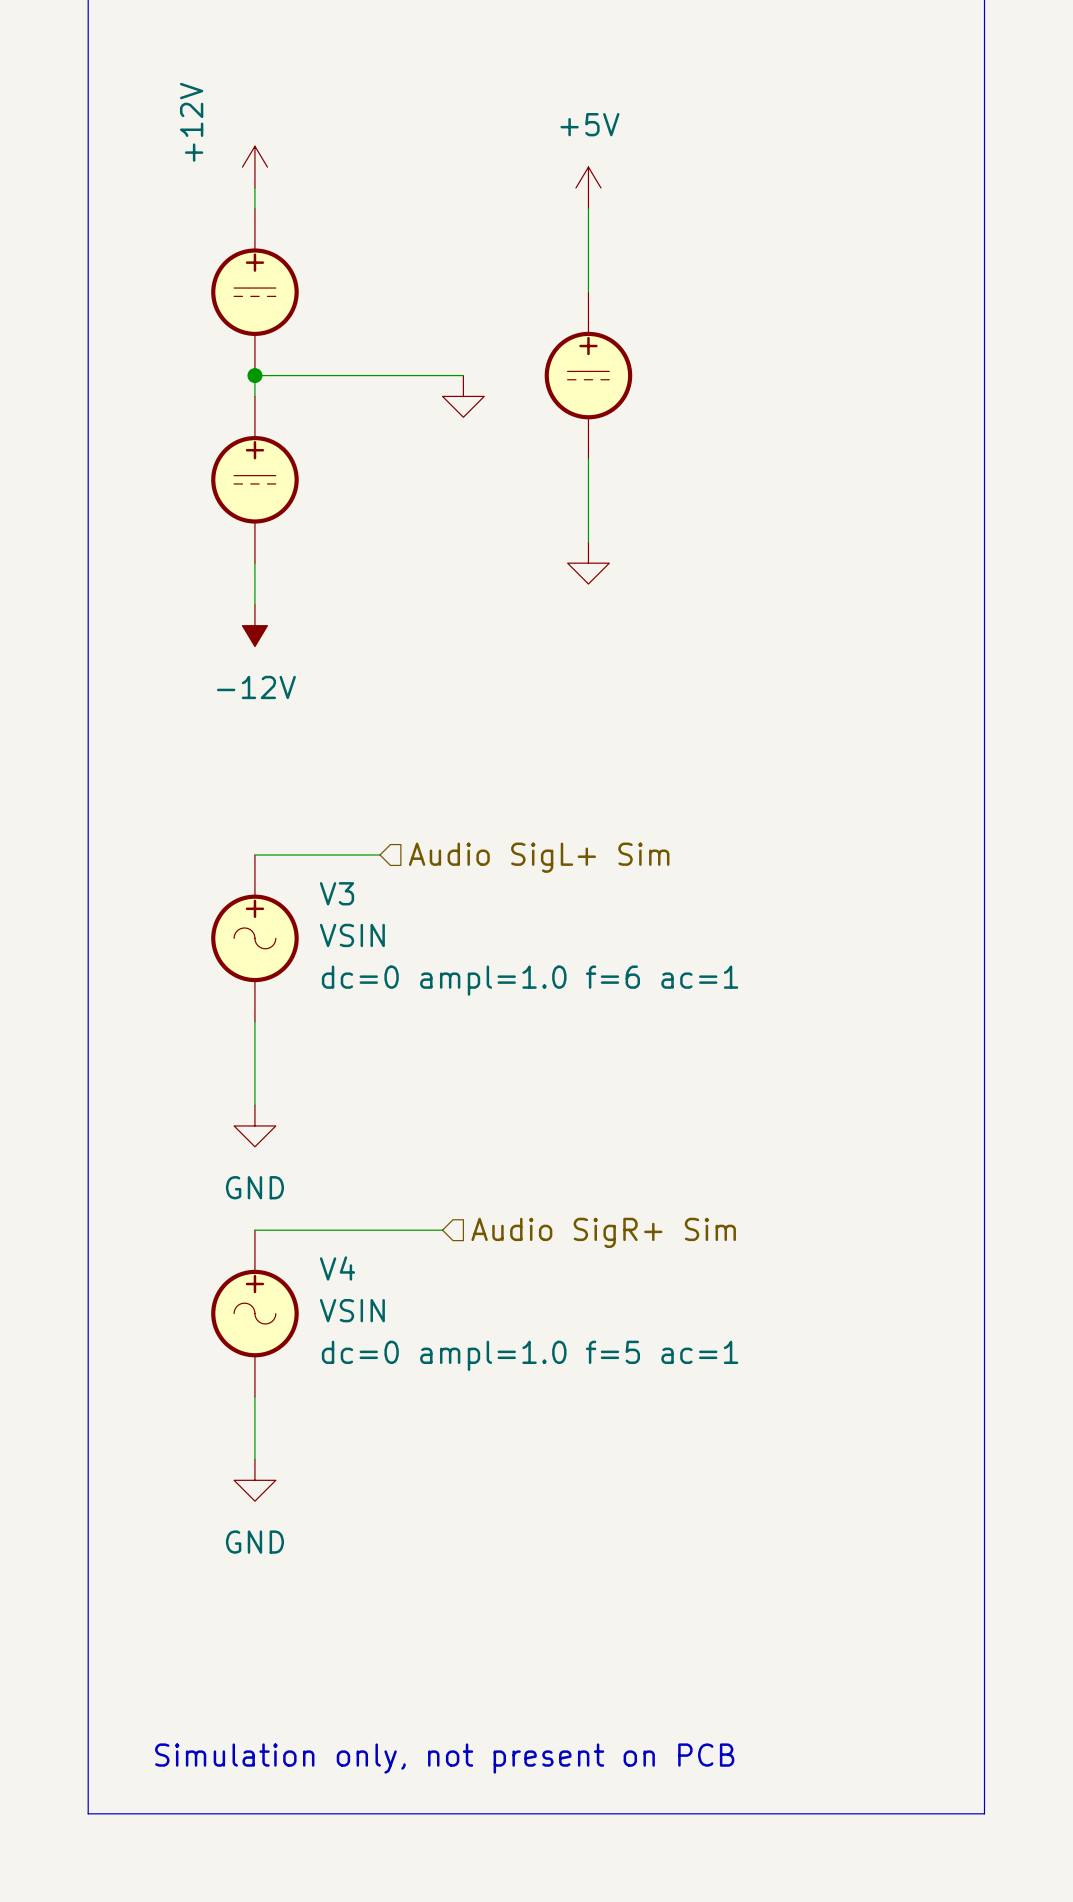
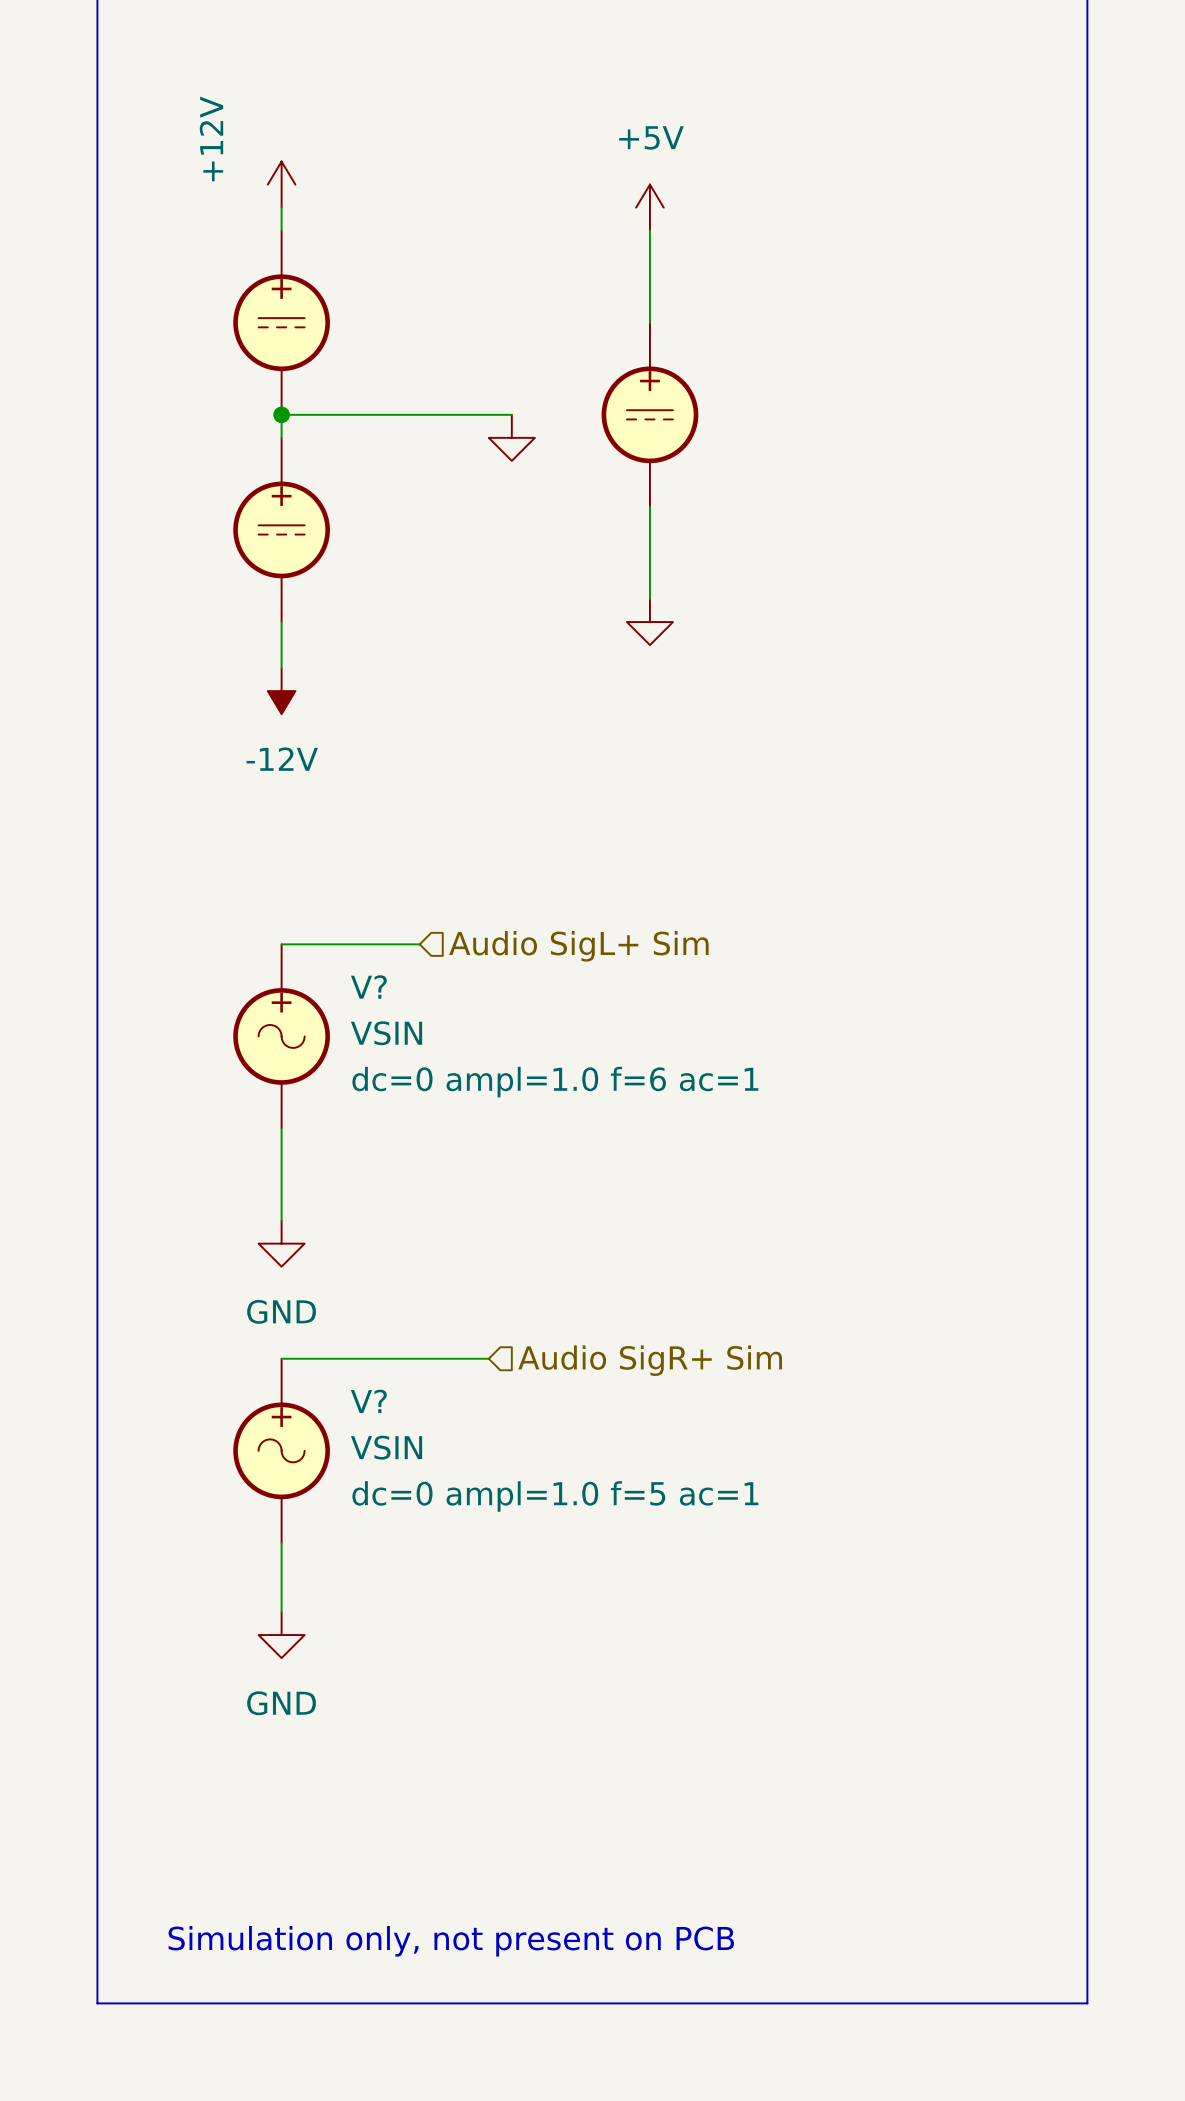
V3 name: V3 (337, 893) -> V? (368, 986)
V4 name: V4 (337, 1268) -> V? (368, 1401)

